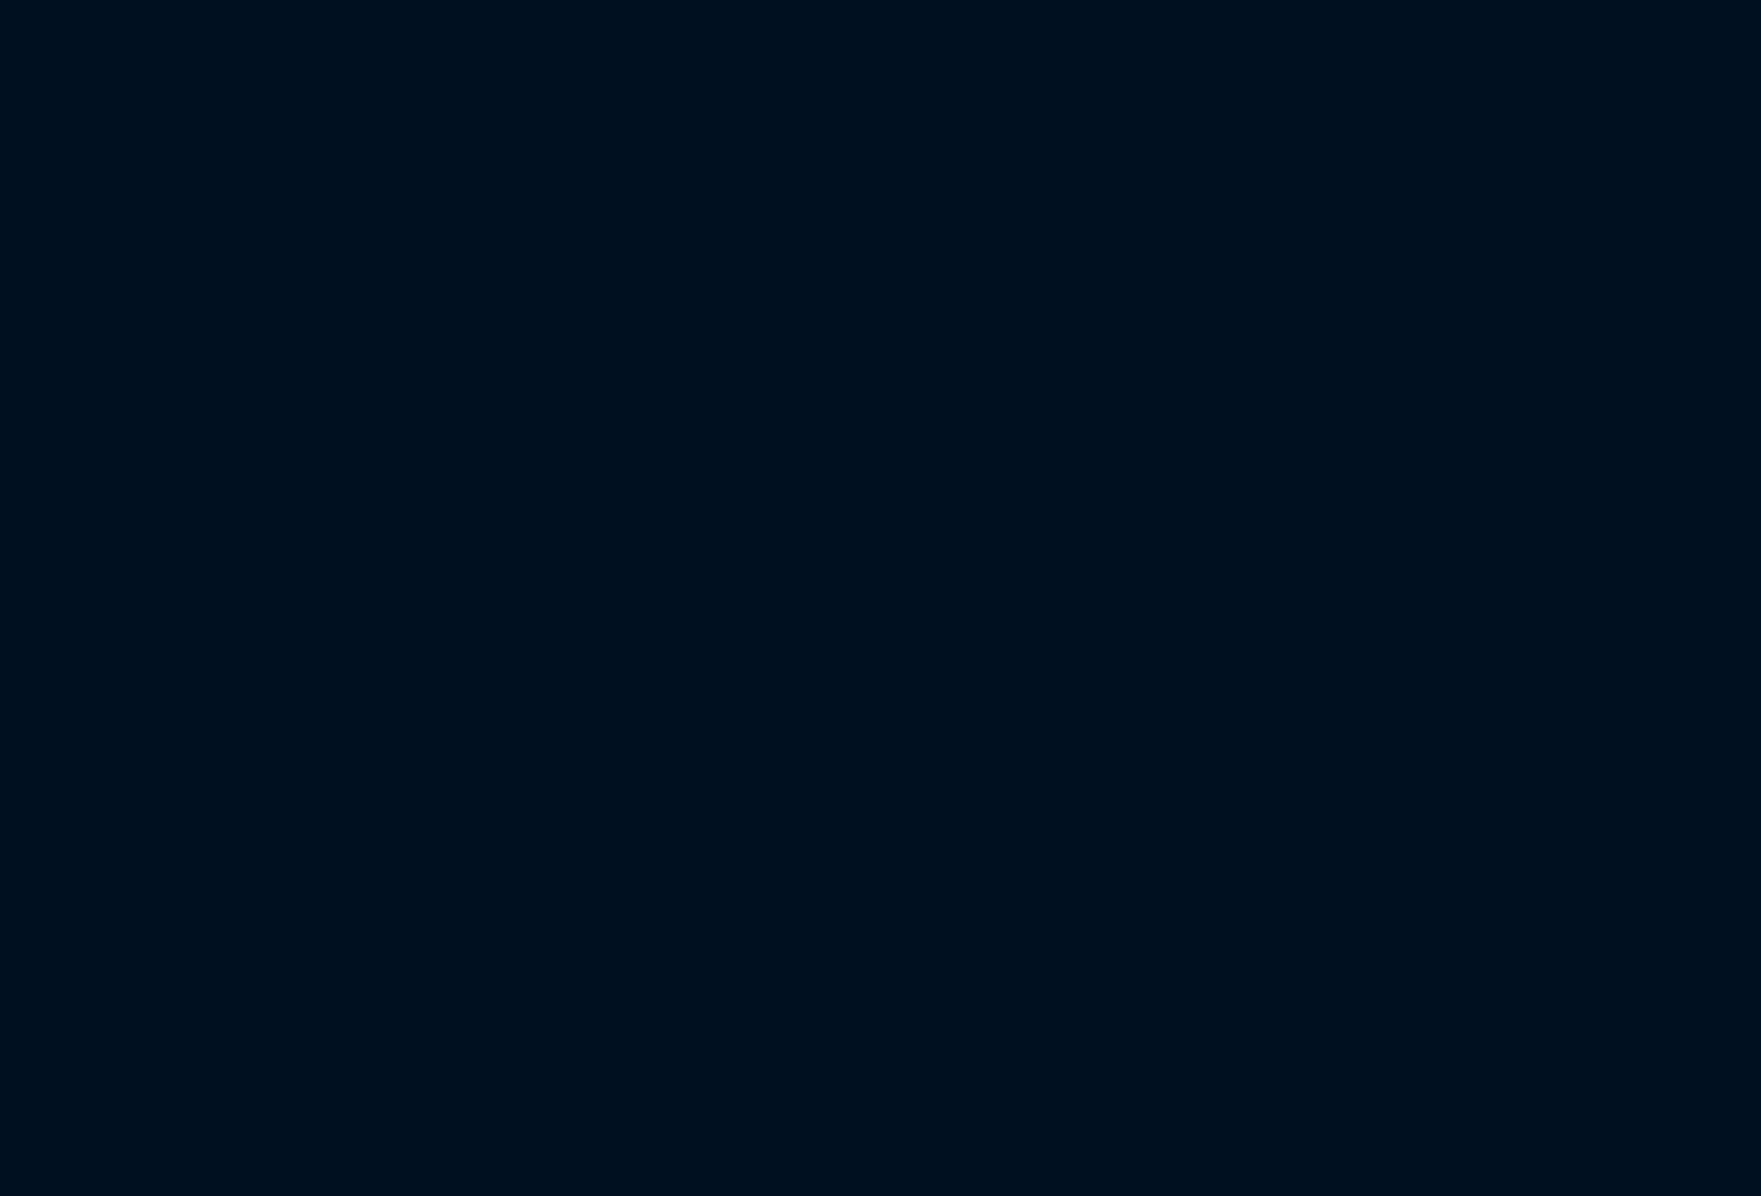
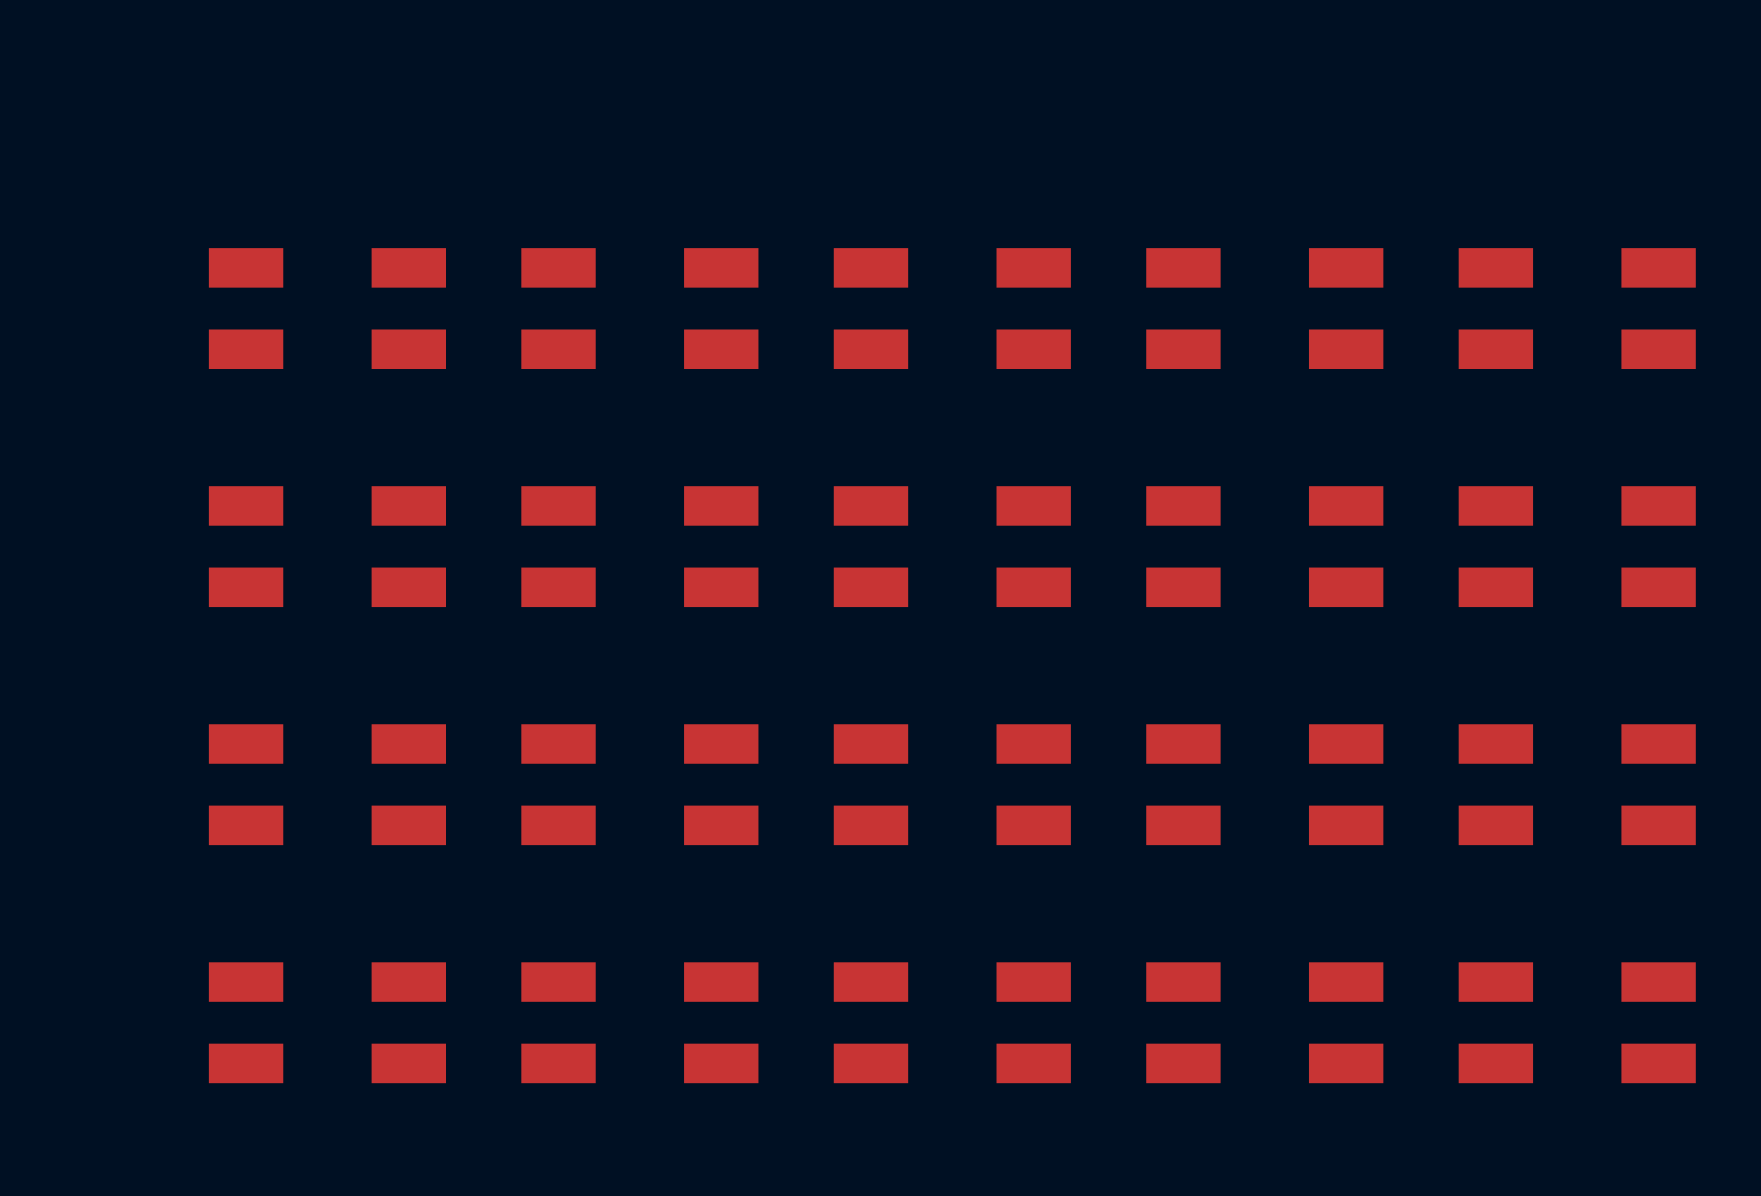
part: none -> (327, 308)
part: none -> (639, 308)
part: none -> (952, 308)
part: none -> (1264, 308)
part: none -> (1577, 308)
part: none -> (327, 546)
part: none -> (639, 546)
part: none -> (952, 546)
part: none -> (1264, 546)
part: none -> (1577, 546)
part: none -> (327, 784)
part: none -> (639, 784)
part: none -> (952, 784)
part: none -> (1264, 784)
part: none -> (1577, 784)
part: none -> (327, 1022)
part: none -> (639, 1022)
part: none -> (952, 1022)
part: none -> (1264, 1022)
part: none -> (1577, 1022)

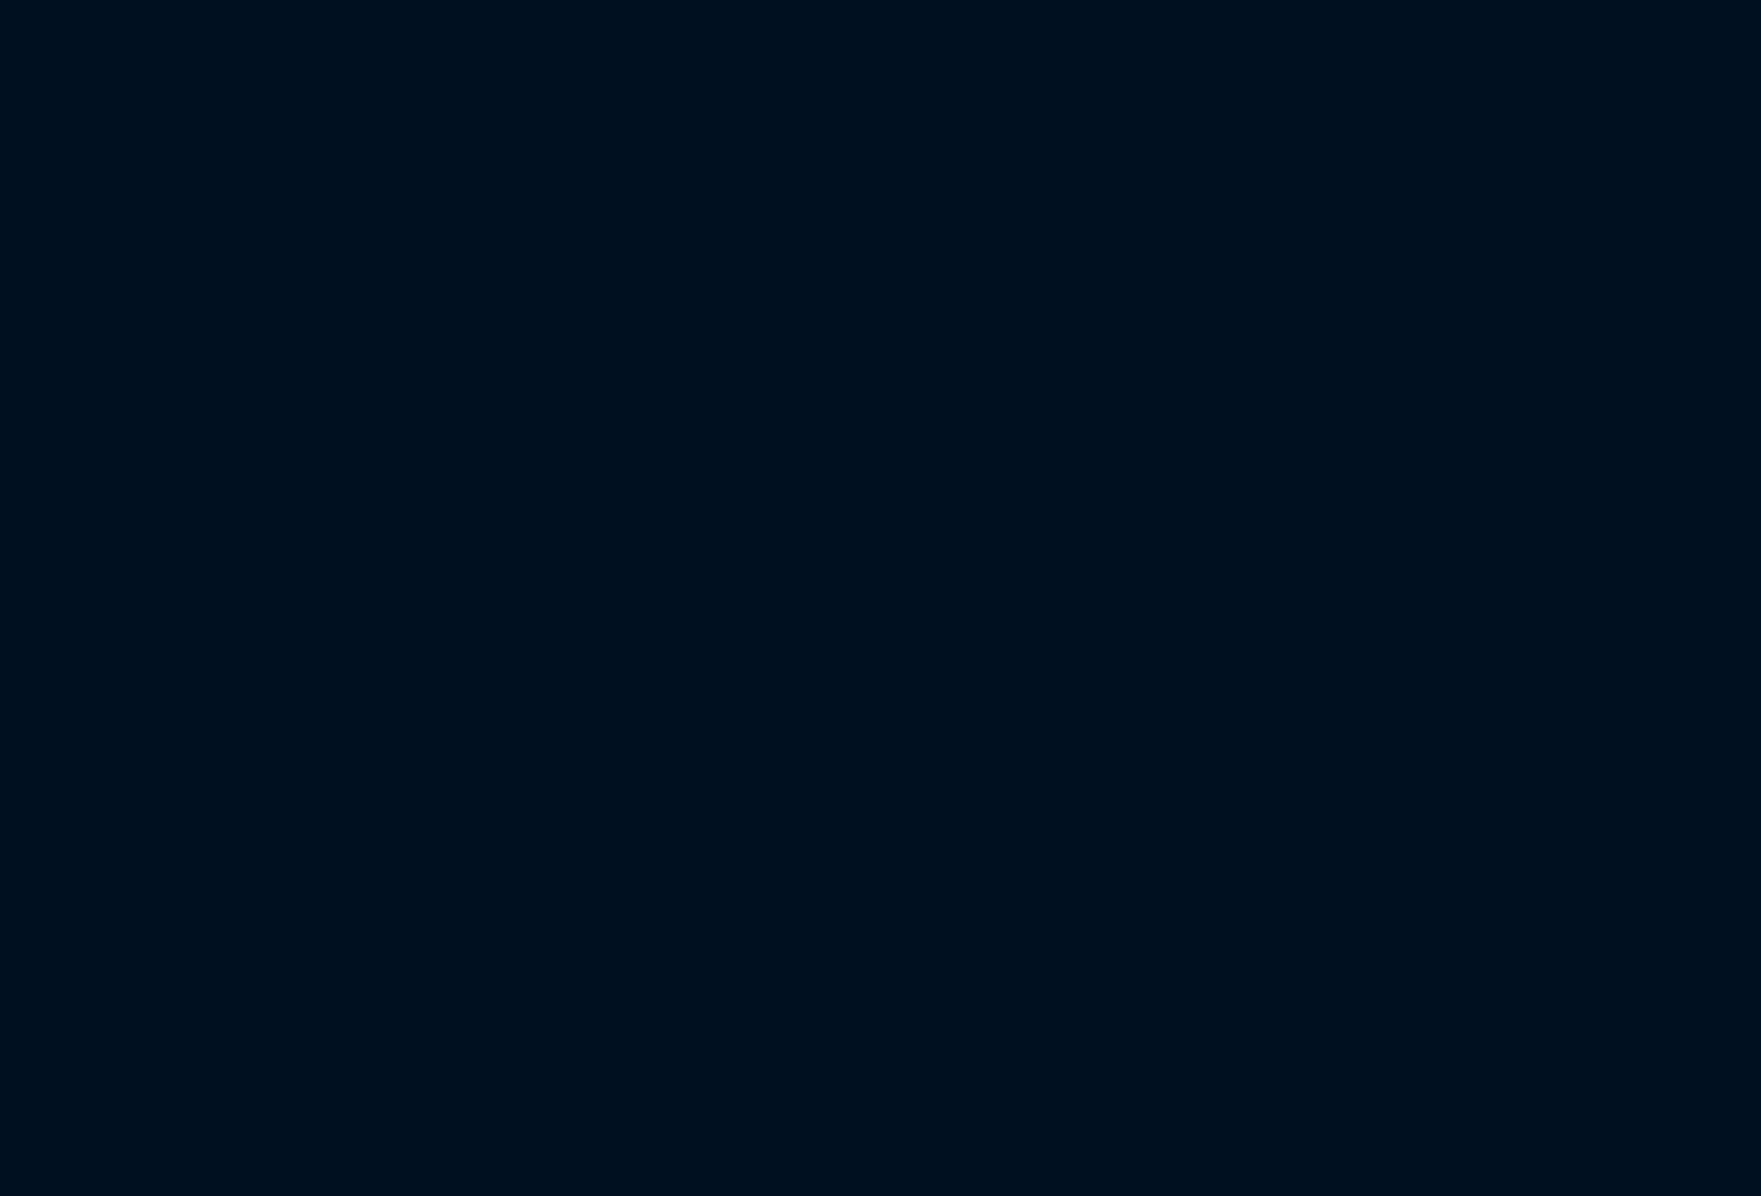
part: (327, 308) -> none
part: (639, 308) -> none
part: (952, 308) -> none
part: (1264, 308) -> none
part: (1577, 308) -> none
part: (327, 546) -> none
part: (639, 546) -> none
part: (952, 546) -> none
part: (1264, 546) -> none
part: (1577, 546) -> none
part: (327, 784) -> none
part: (639, 784) -> none
part: (952, 784) -> none
part: (1264, 784) -> none
part: (1577, 784) -> none
part: (327, 1022) -> none
part: (639, 1022) -> none
part: (952, 1022) -> none
part: (1264, 1022) -> none
part: (1577, 1022) -> none

